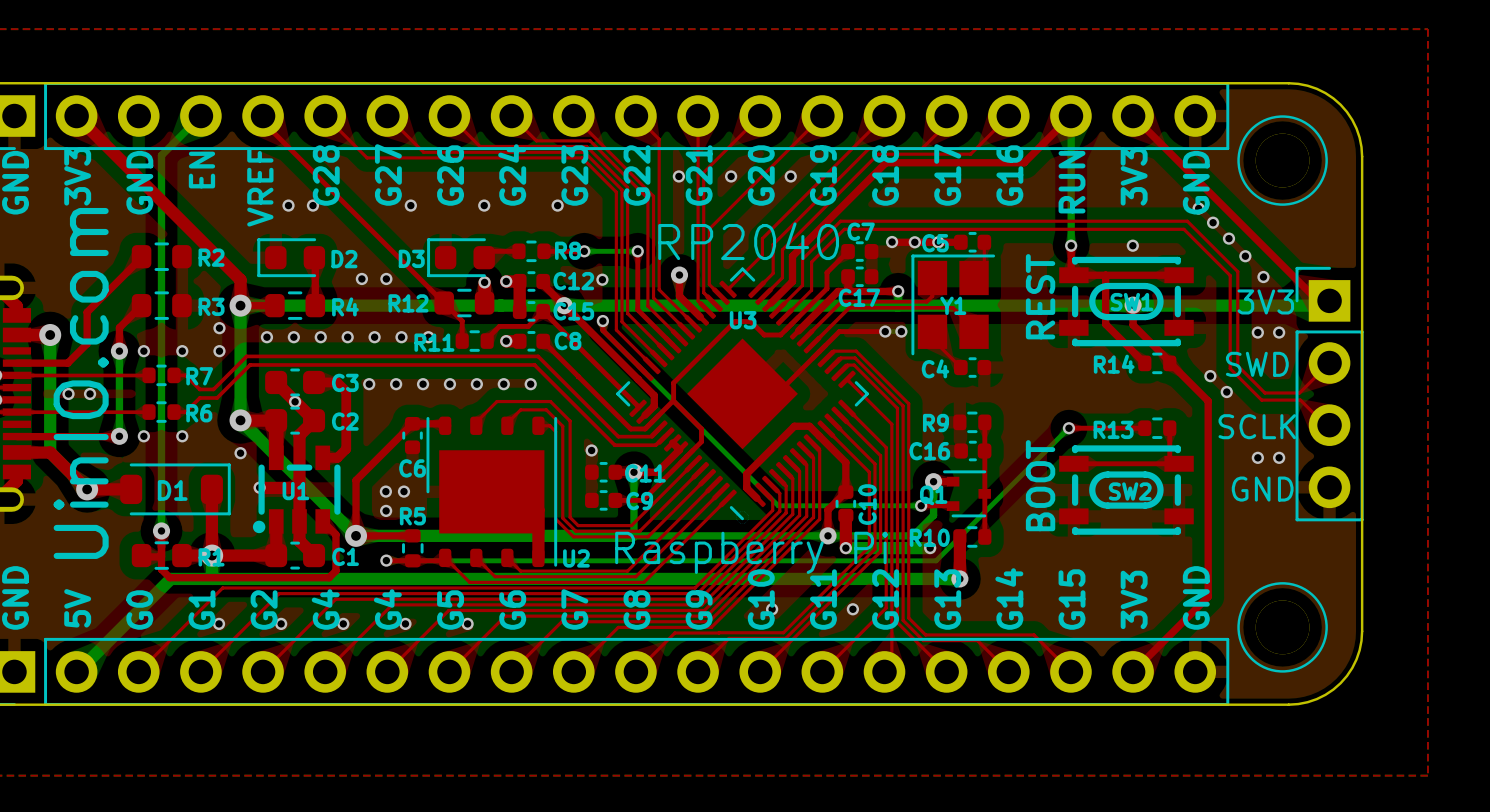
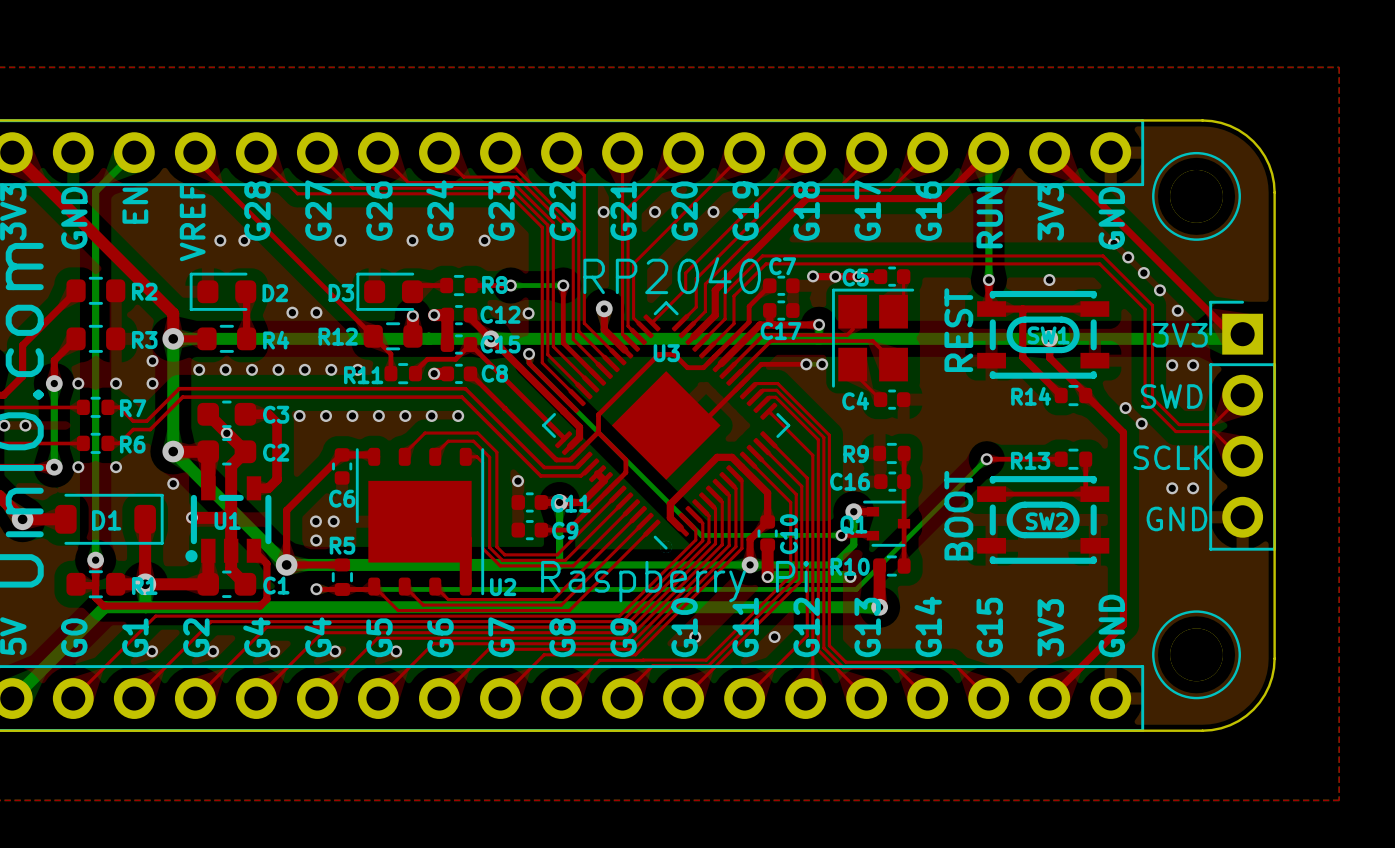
Y1 name: Y1 (953, 305) -> none

